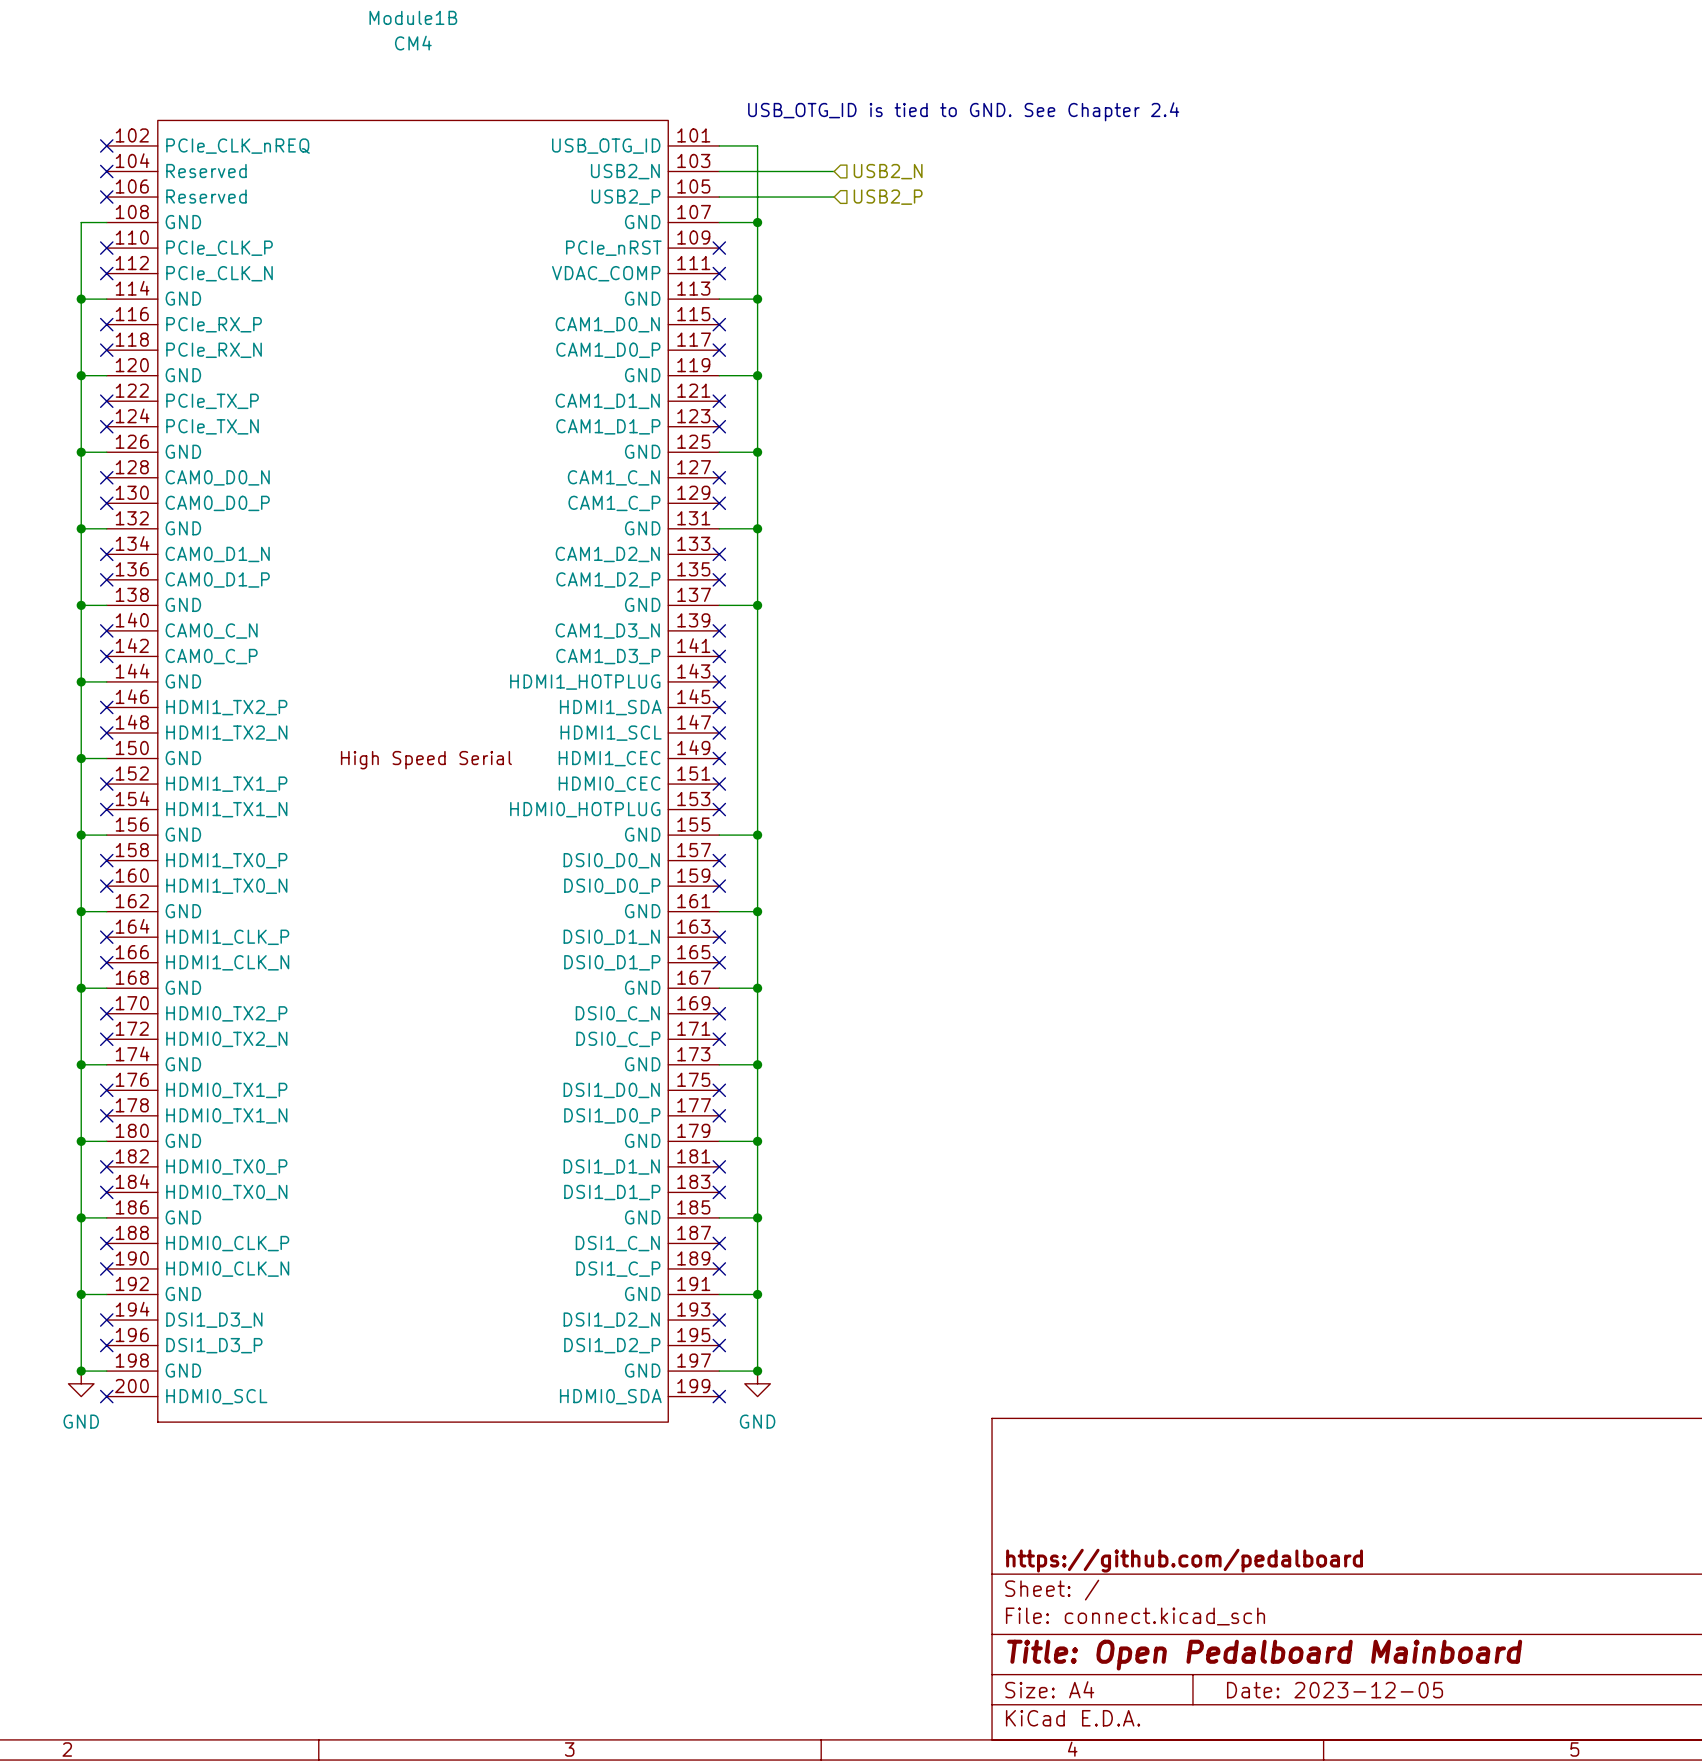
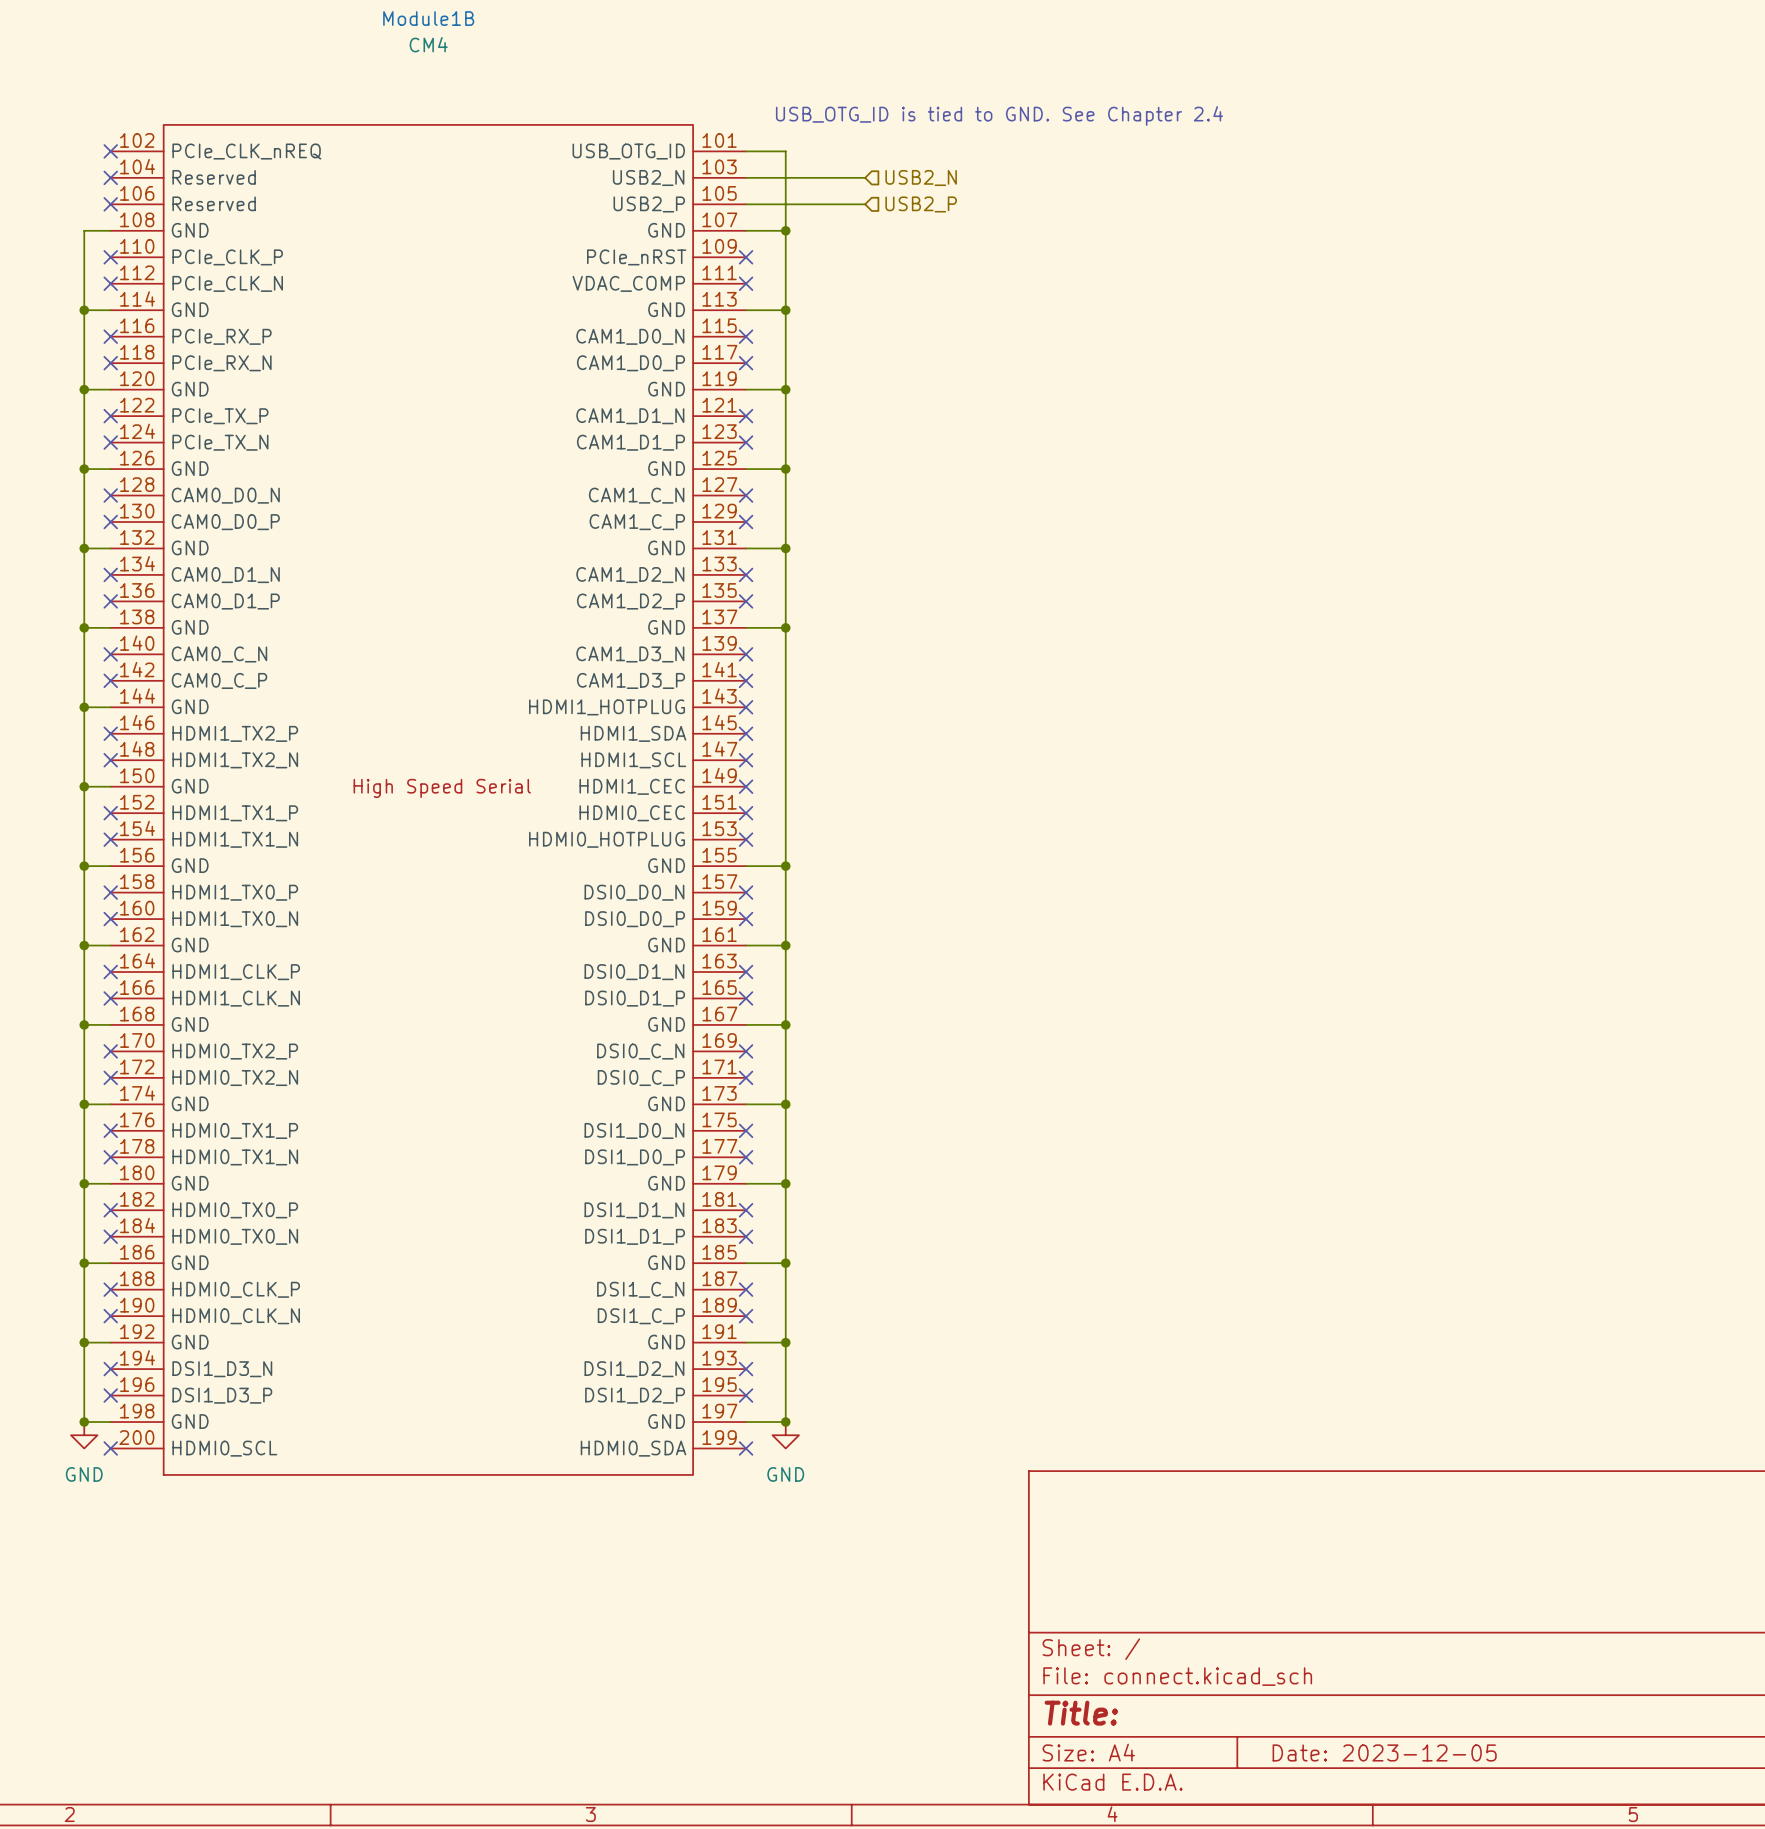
title block: https://github.com/pedalboard (1184, 1560) -> none
title block: Title: Open Pedalboard Mainboard (1264, 1655) -> Title: (1081, 1713)

